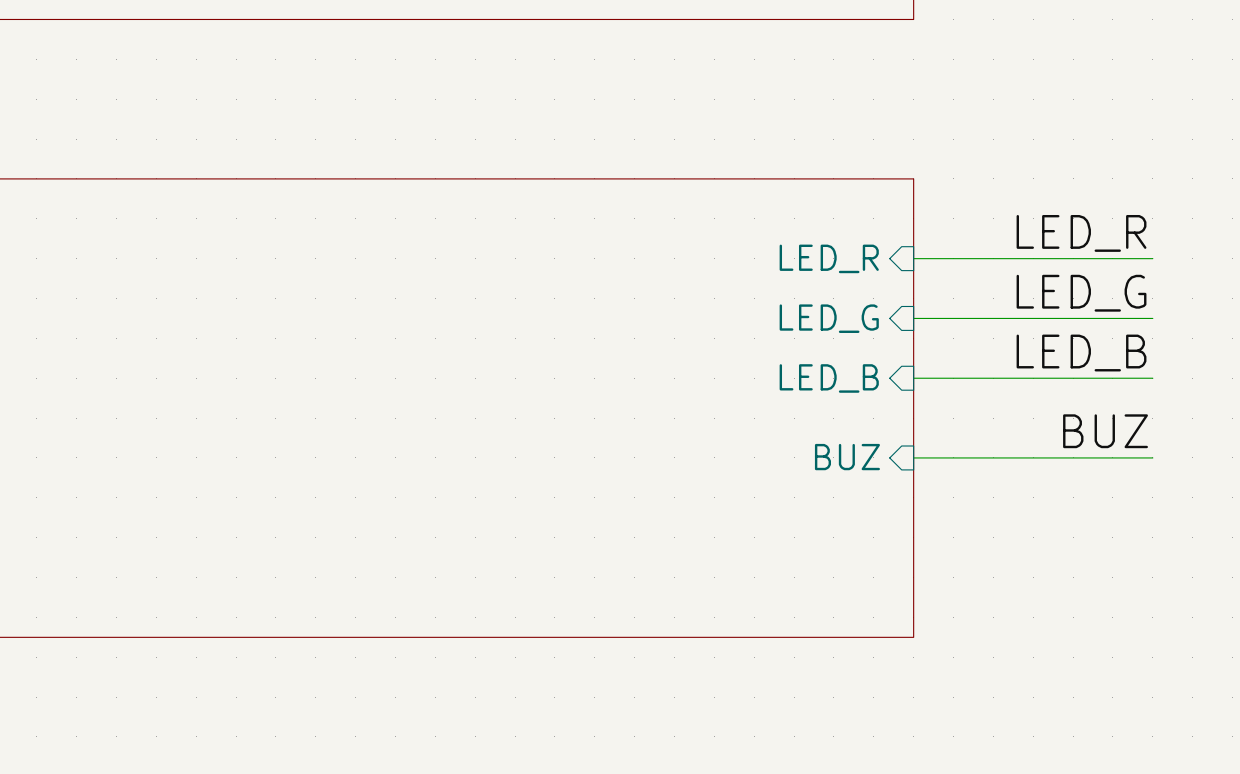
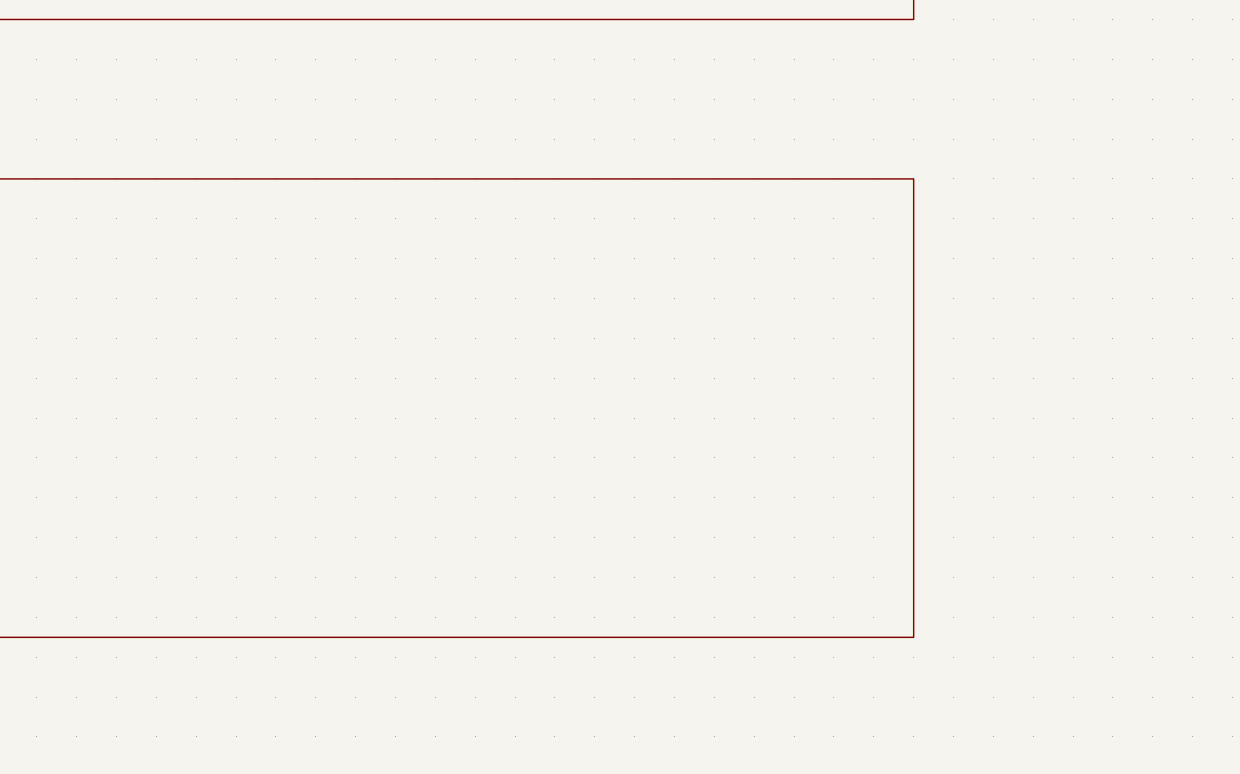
label: LED_R (1081, 233) -> none
sheet pin: LED_R (829, 258) -> none
wire: (913, 258) (1152, 258) -> none
label: LED_G (1081, 293) -> none
sheet pin: LED_G (829, 318) -> none
wire: (913, 318) (1152, 318) -> none
label: LED_B (1081, 353) -> none
sheet pin: LED_B (829, 378) -> none
wire: (913, 378) (1152, 378) -> none
label: BUZ (1105, 431) -> none
sheet pin: BUZ (847, 457) -> none
wire: (913, 457) (1152, 457) -> none

